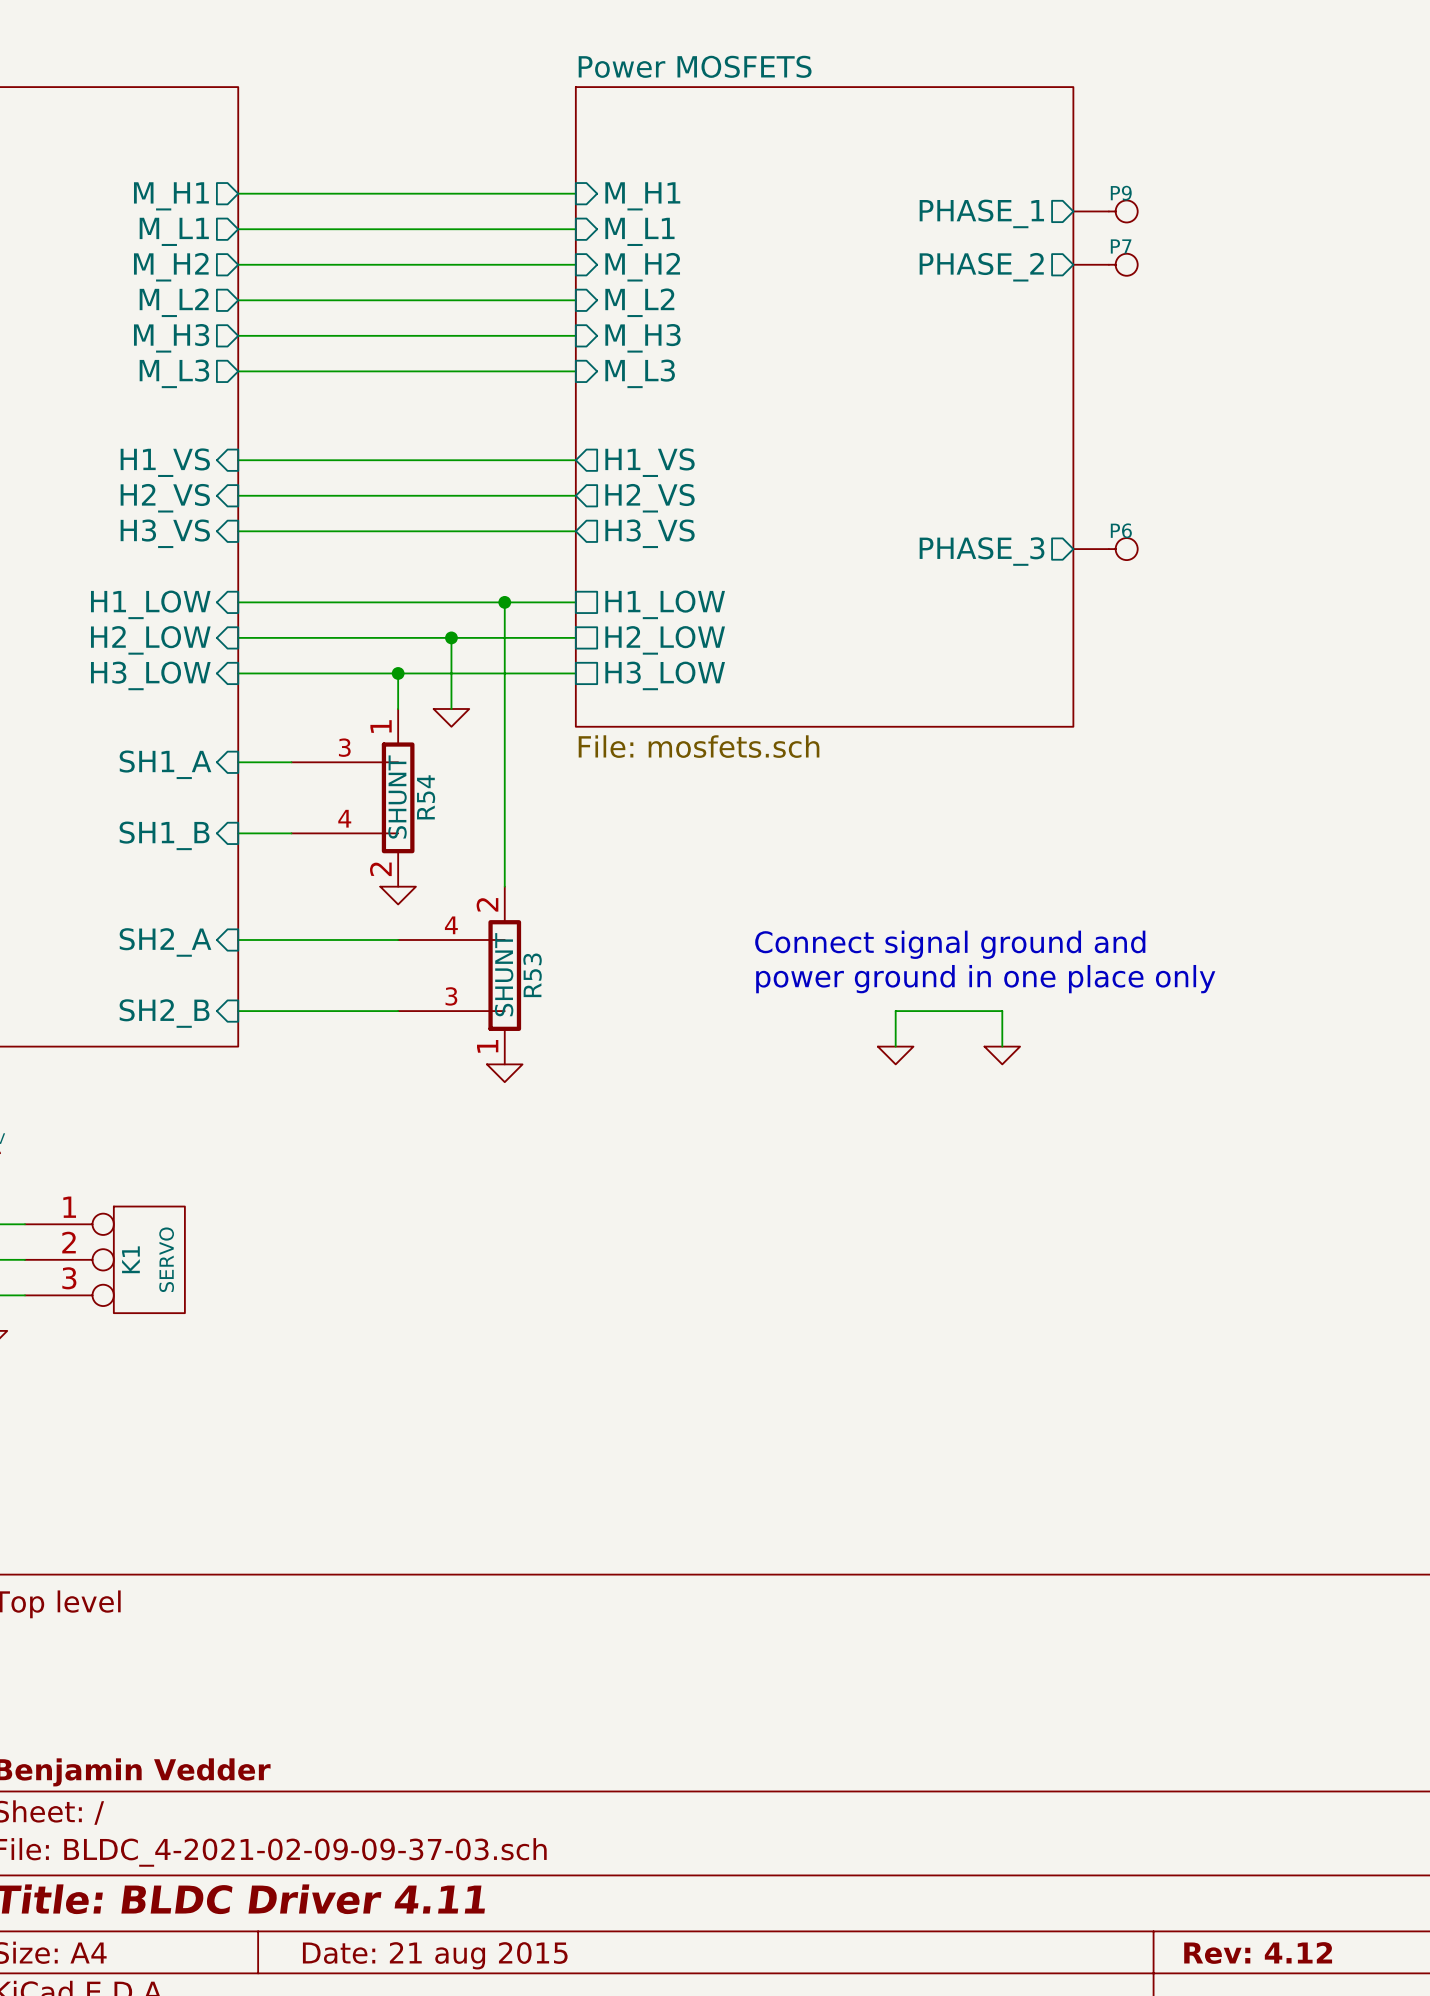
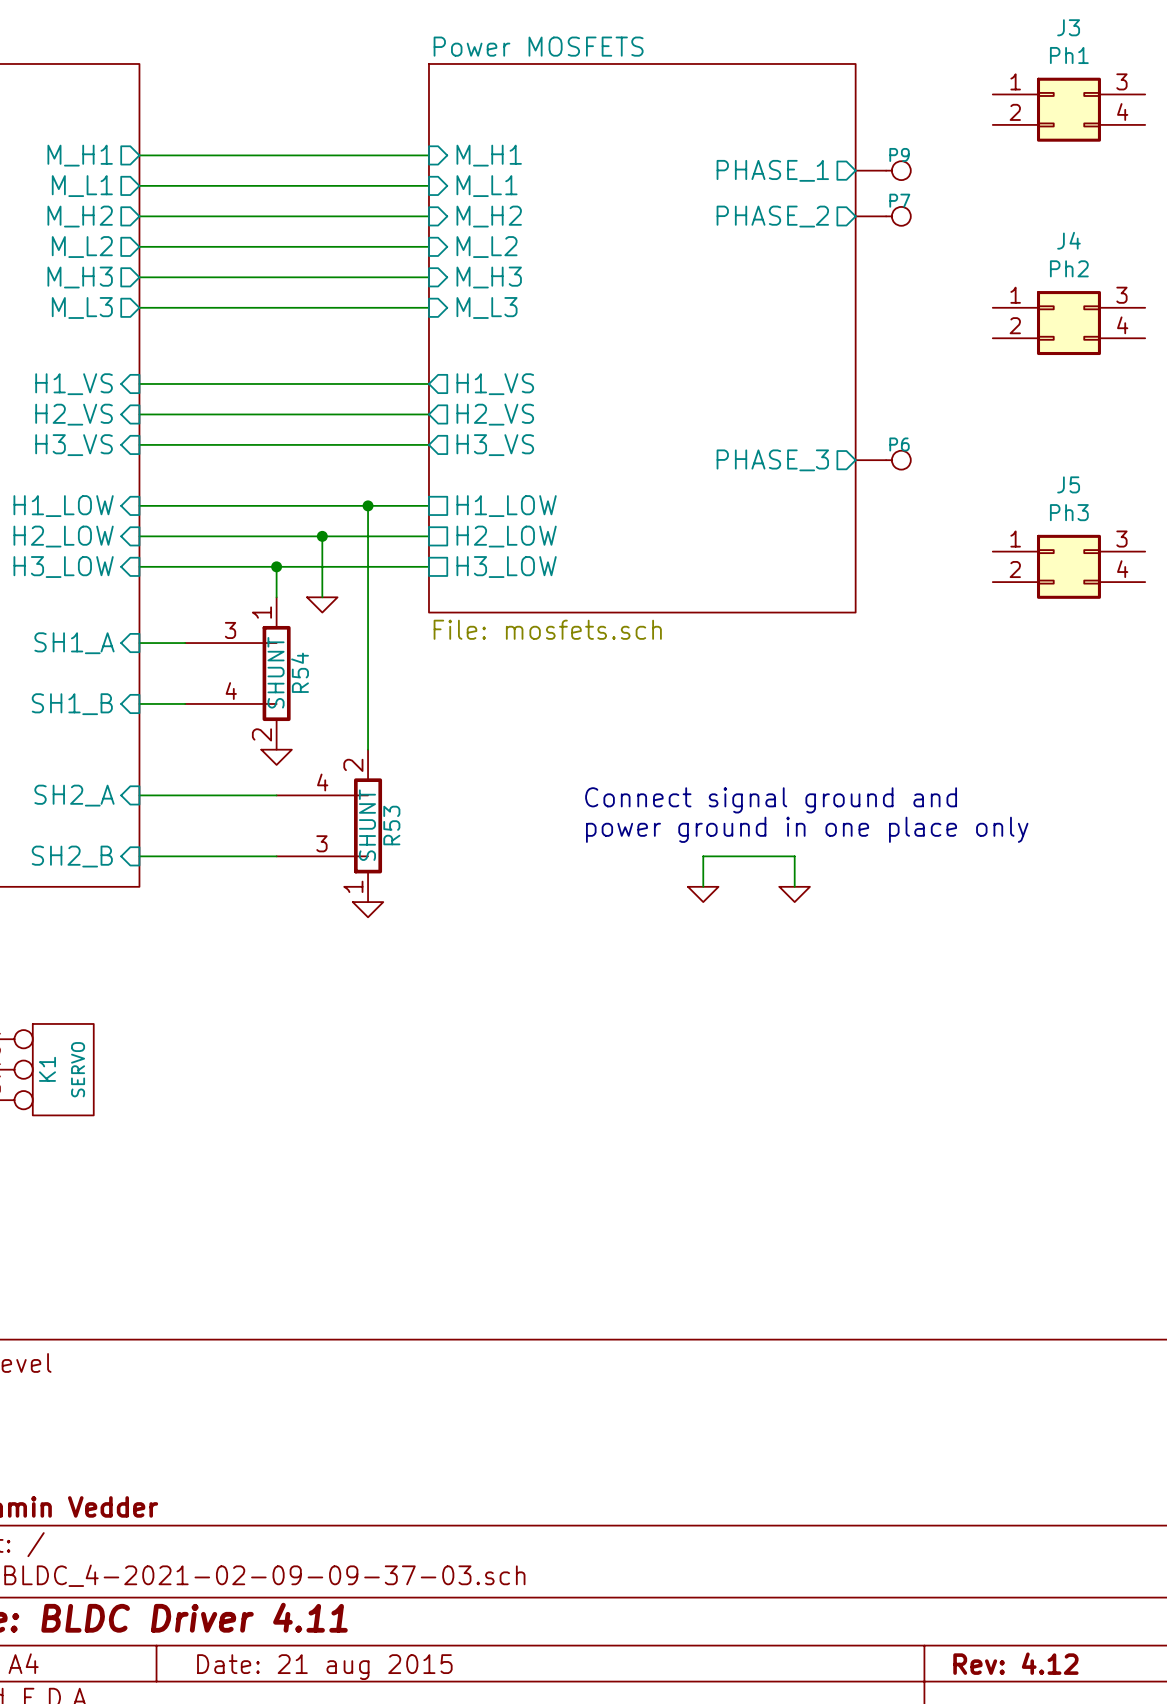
J3: none -> Ph1 (1068, 109)
J4: none -> Ph2 (1068, 323)
J5: none -> Ph3 (1068, 566)

